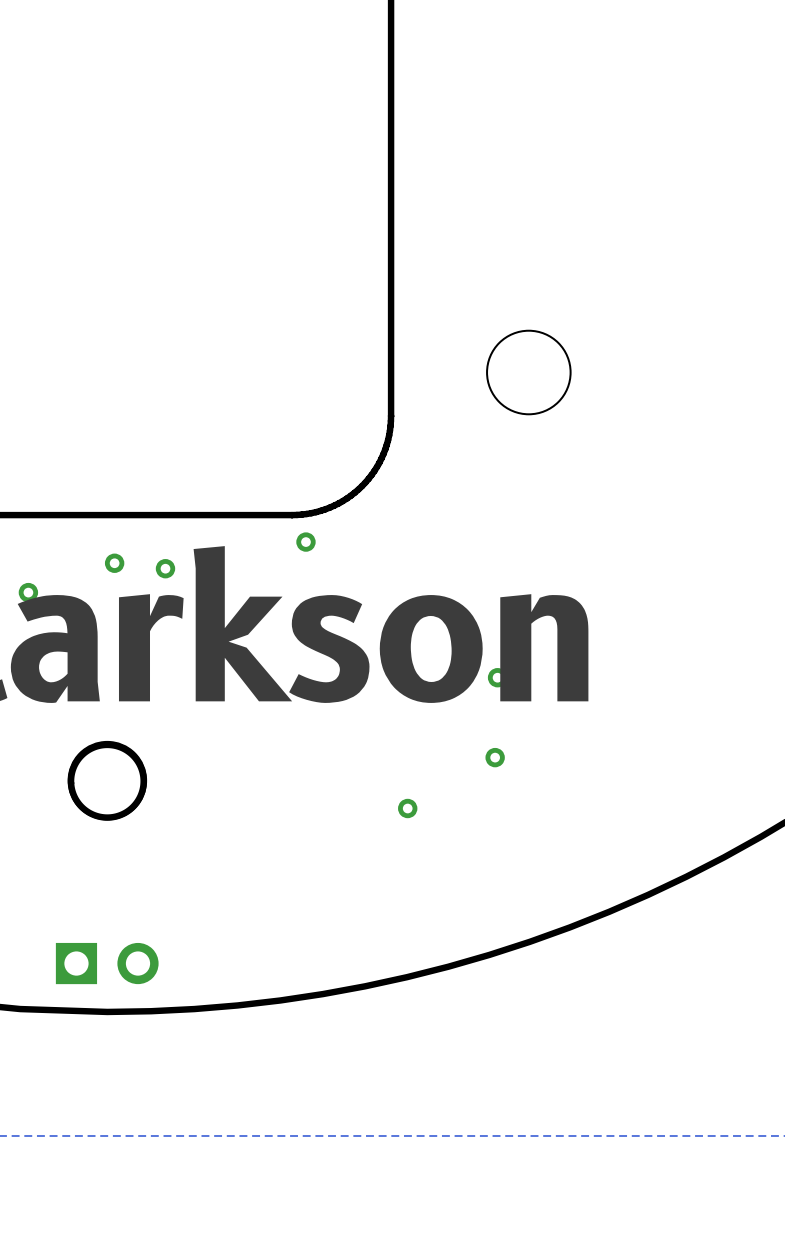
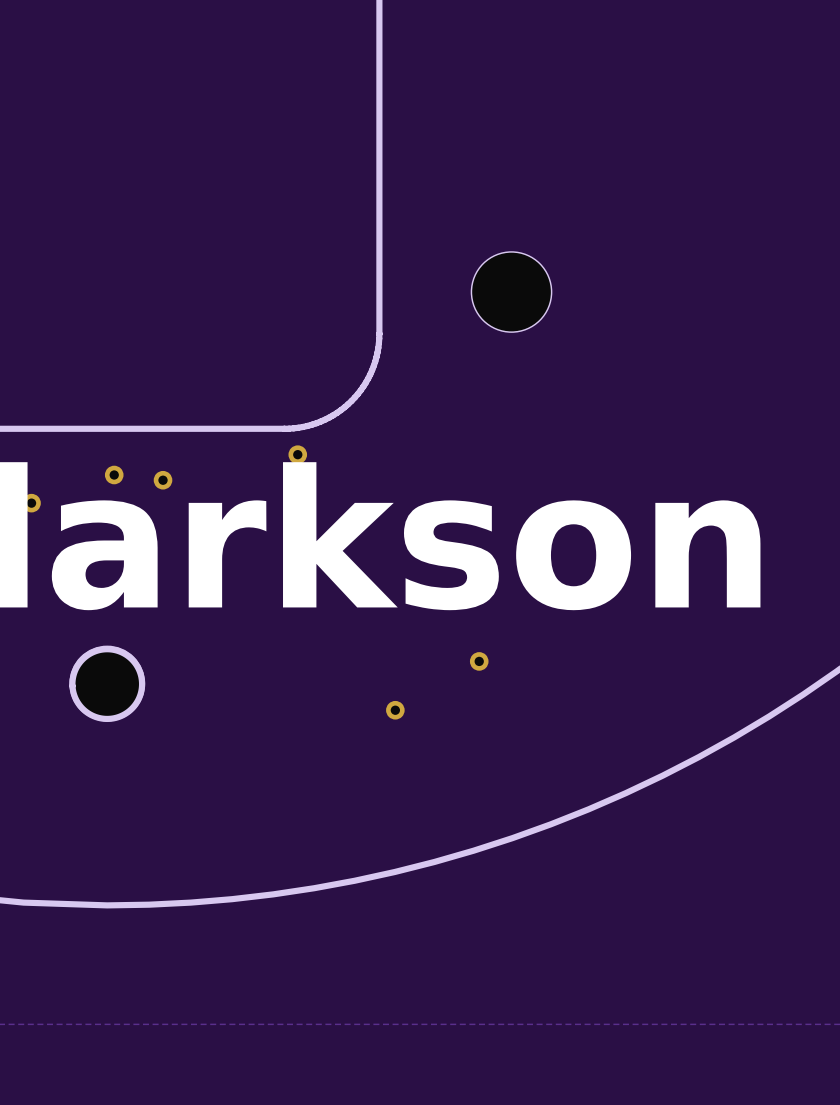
part: (107, 963) -> none

